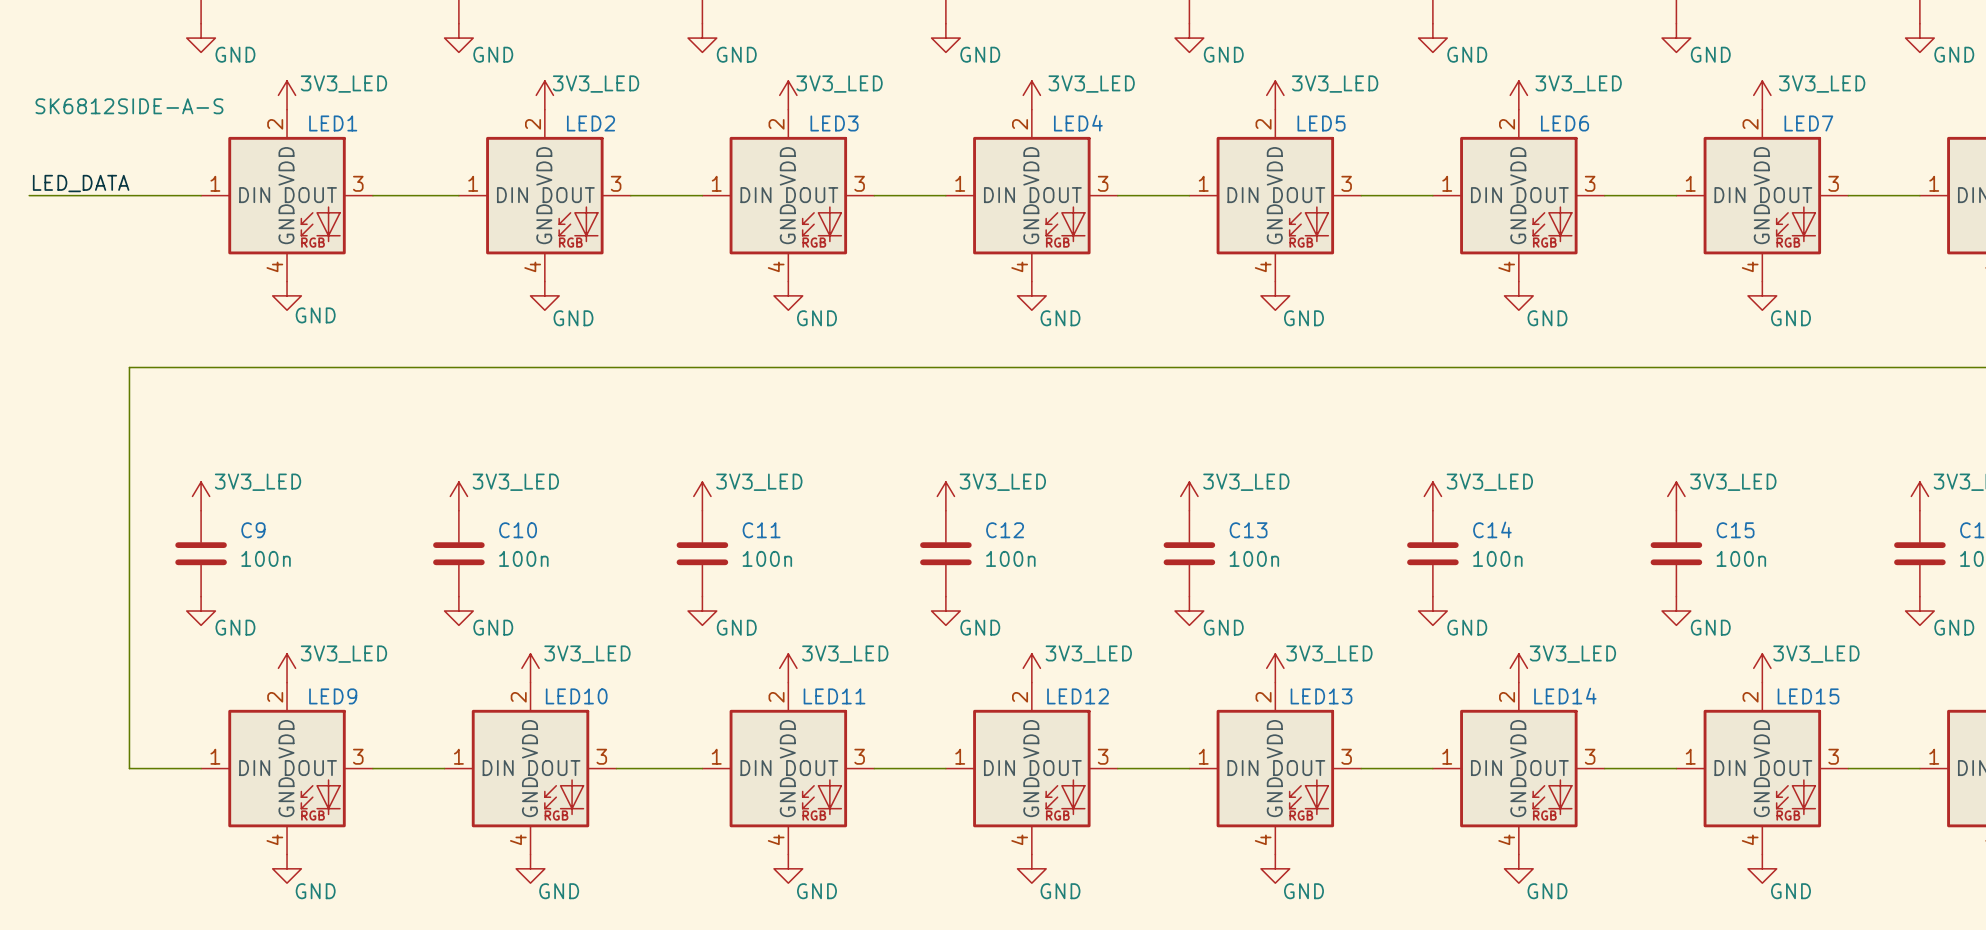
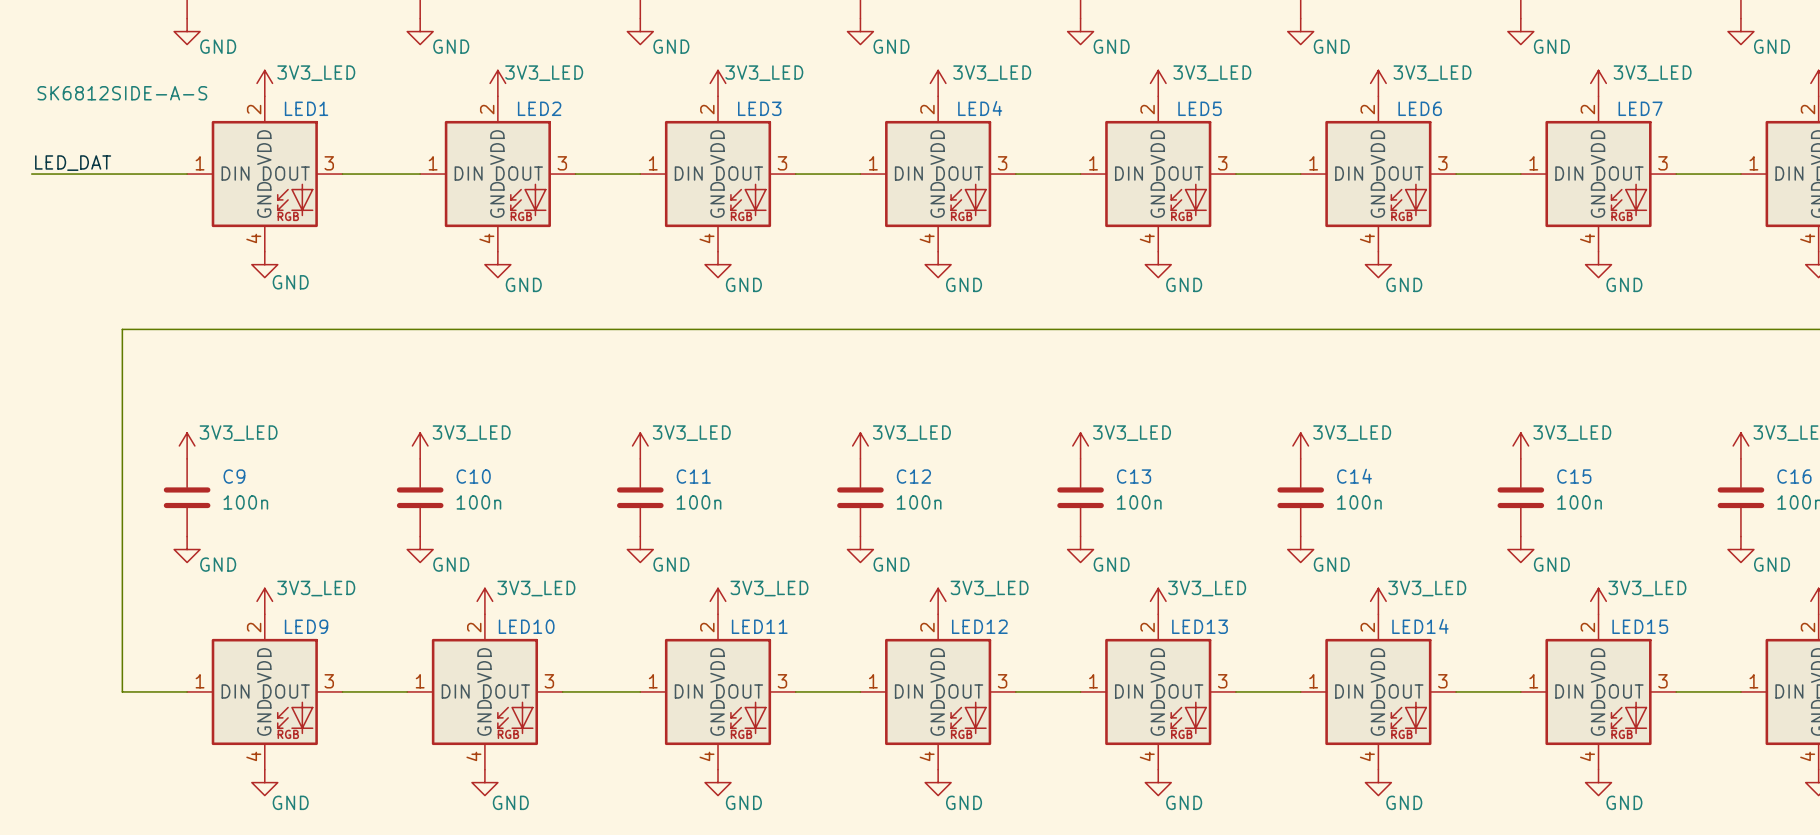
label: LED_DATA (81, 183) -> LED_DAT (73, 163)

